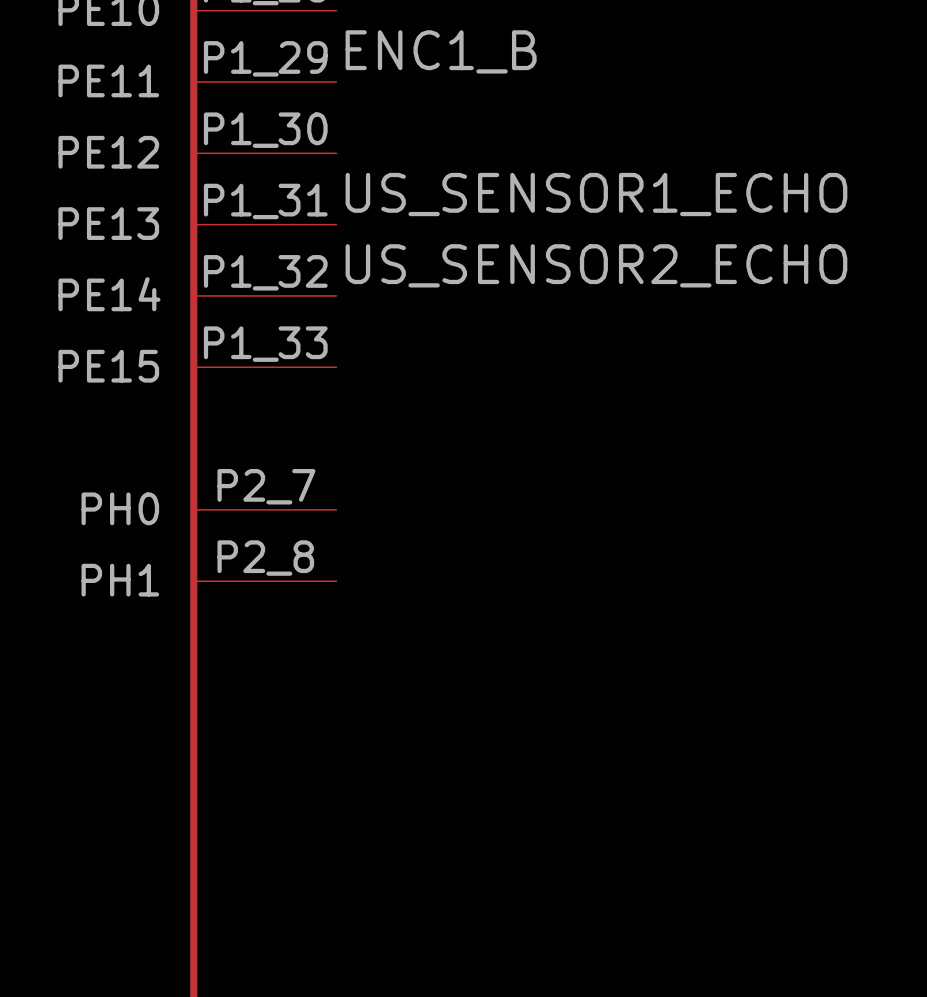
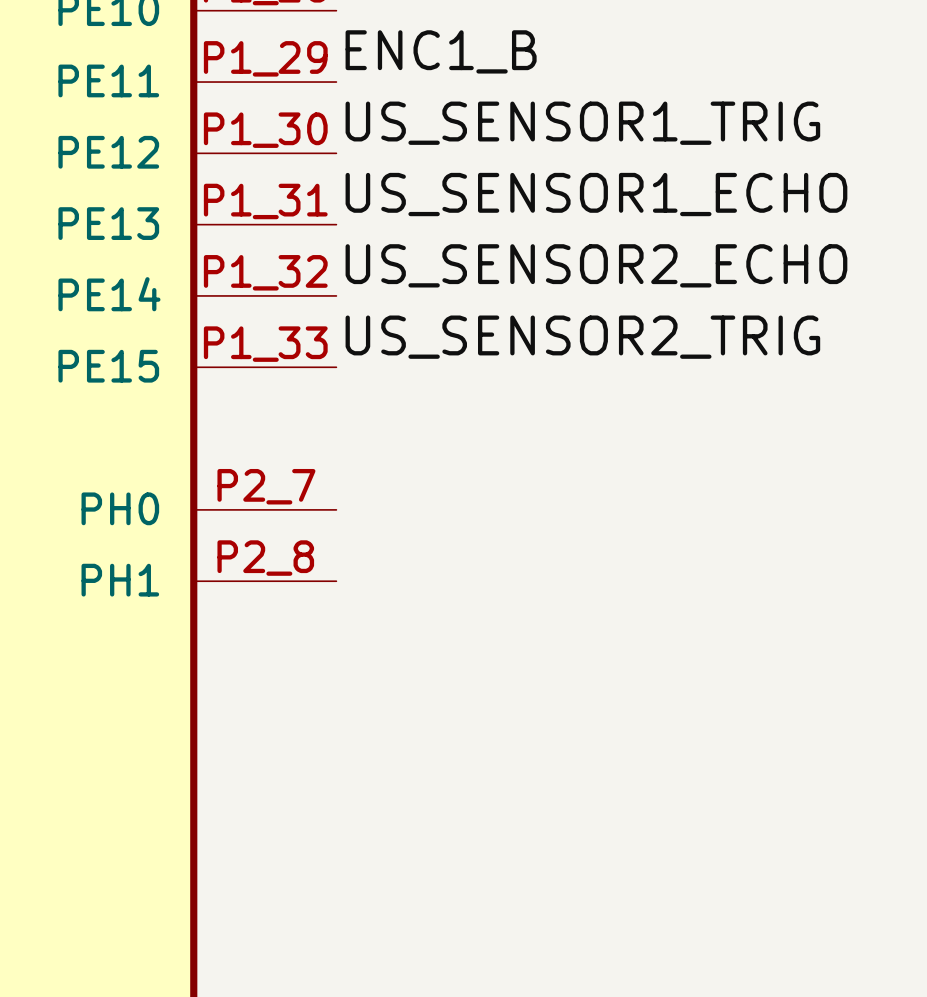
label: none -> US_SENSOR1_TRIG (582, 123)
label: none -> US_SENSOR2_TRIG (582, 337)

